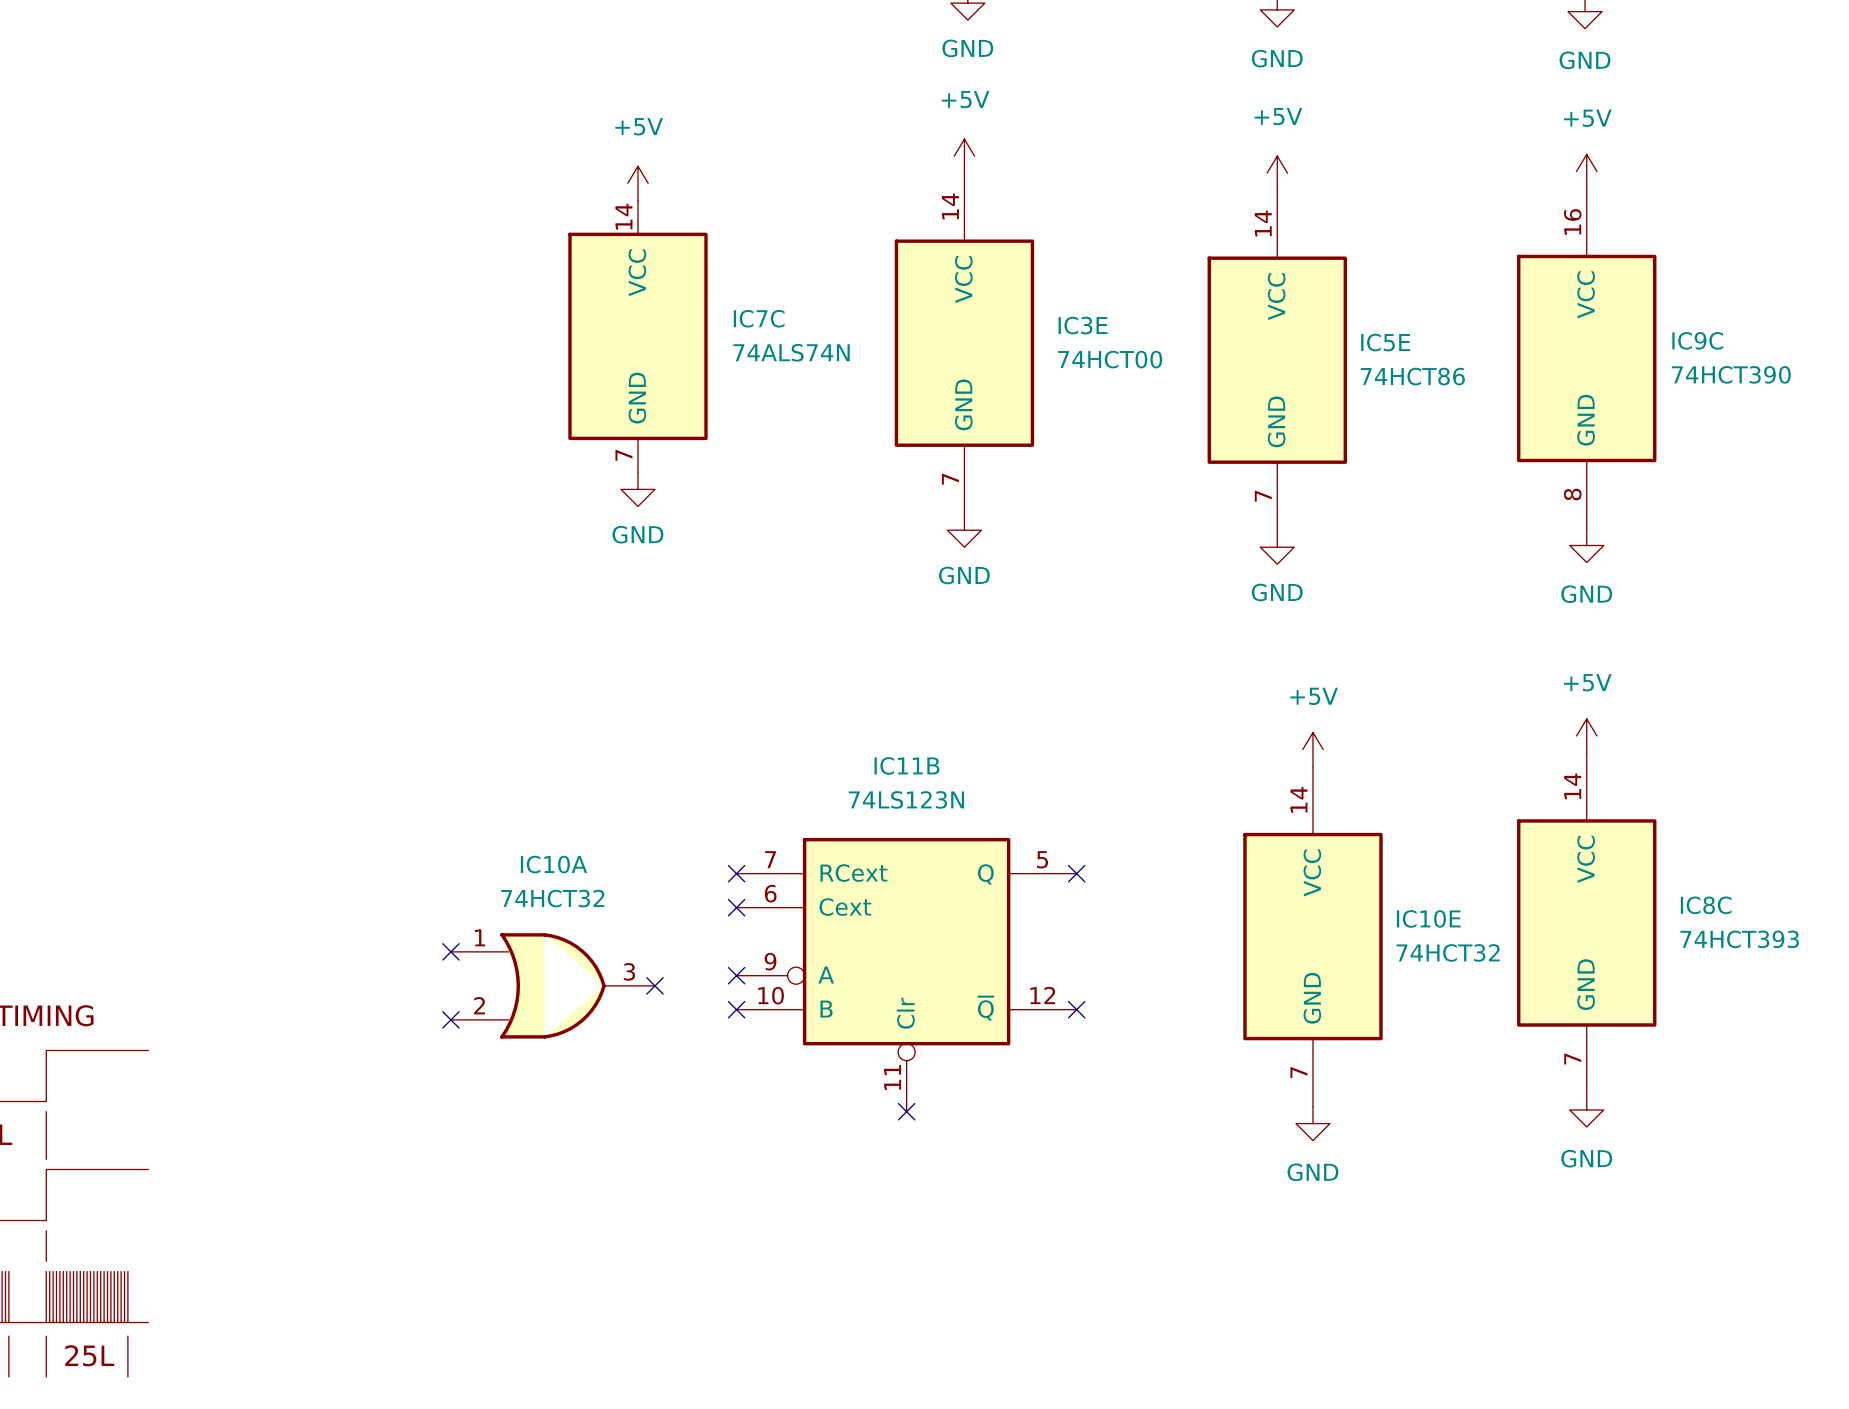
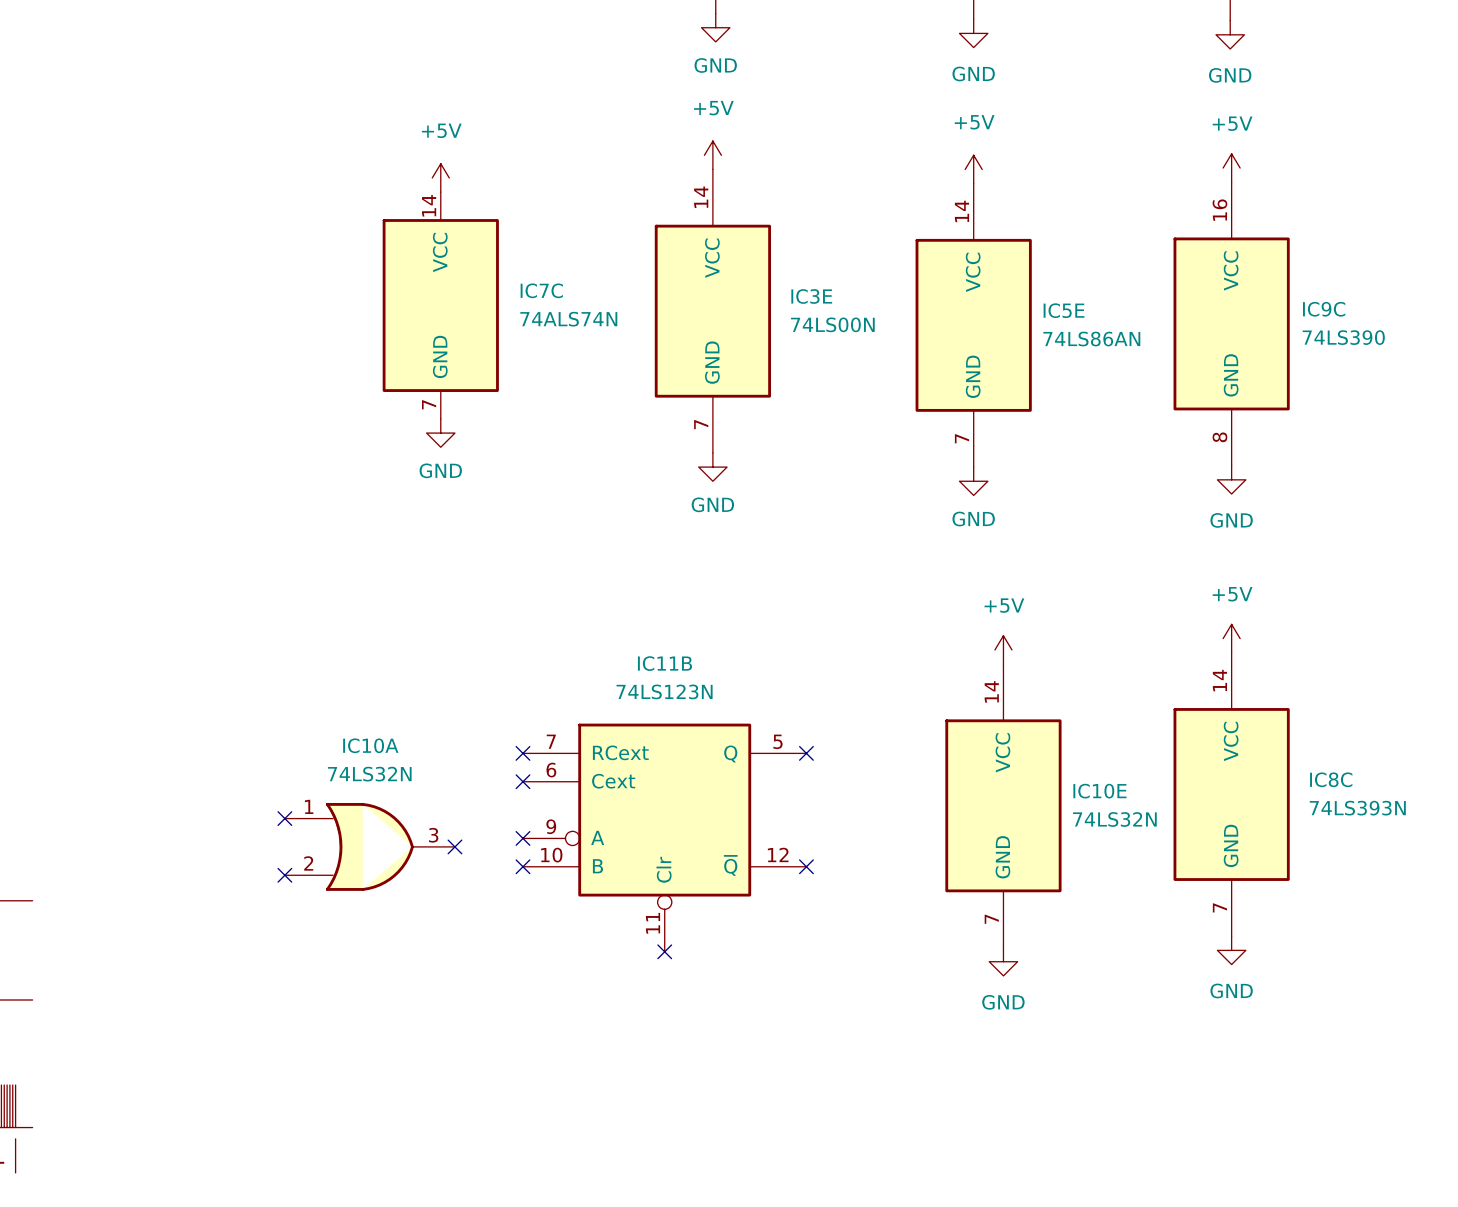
IC3E value: 74HCT00 (1110, 359) -> 74LS00N (832, 324)
IC9C value: 74HCT390 (1731, 374) -> 74LS390 (1343, 337)
IC5E value: 74HCT86 (1412, 376) -> 74LS86AN (1091, 339)
IC10A value: 74HCT32 (552, 898) -> 74LS32N (369, 774)
IC8C value: 74HCT393 (1739, 939) -> 74LS393N (1357, 808)
IC10E value: 74HCT32 (1448, 952) -> 74LS32N (1114, 819)

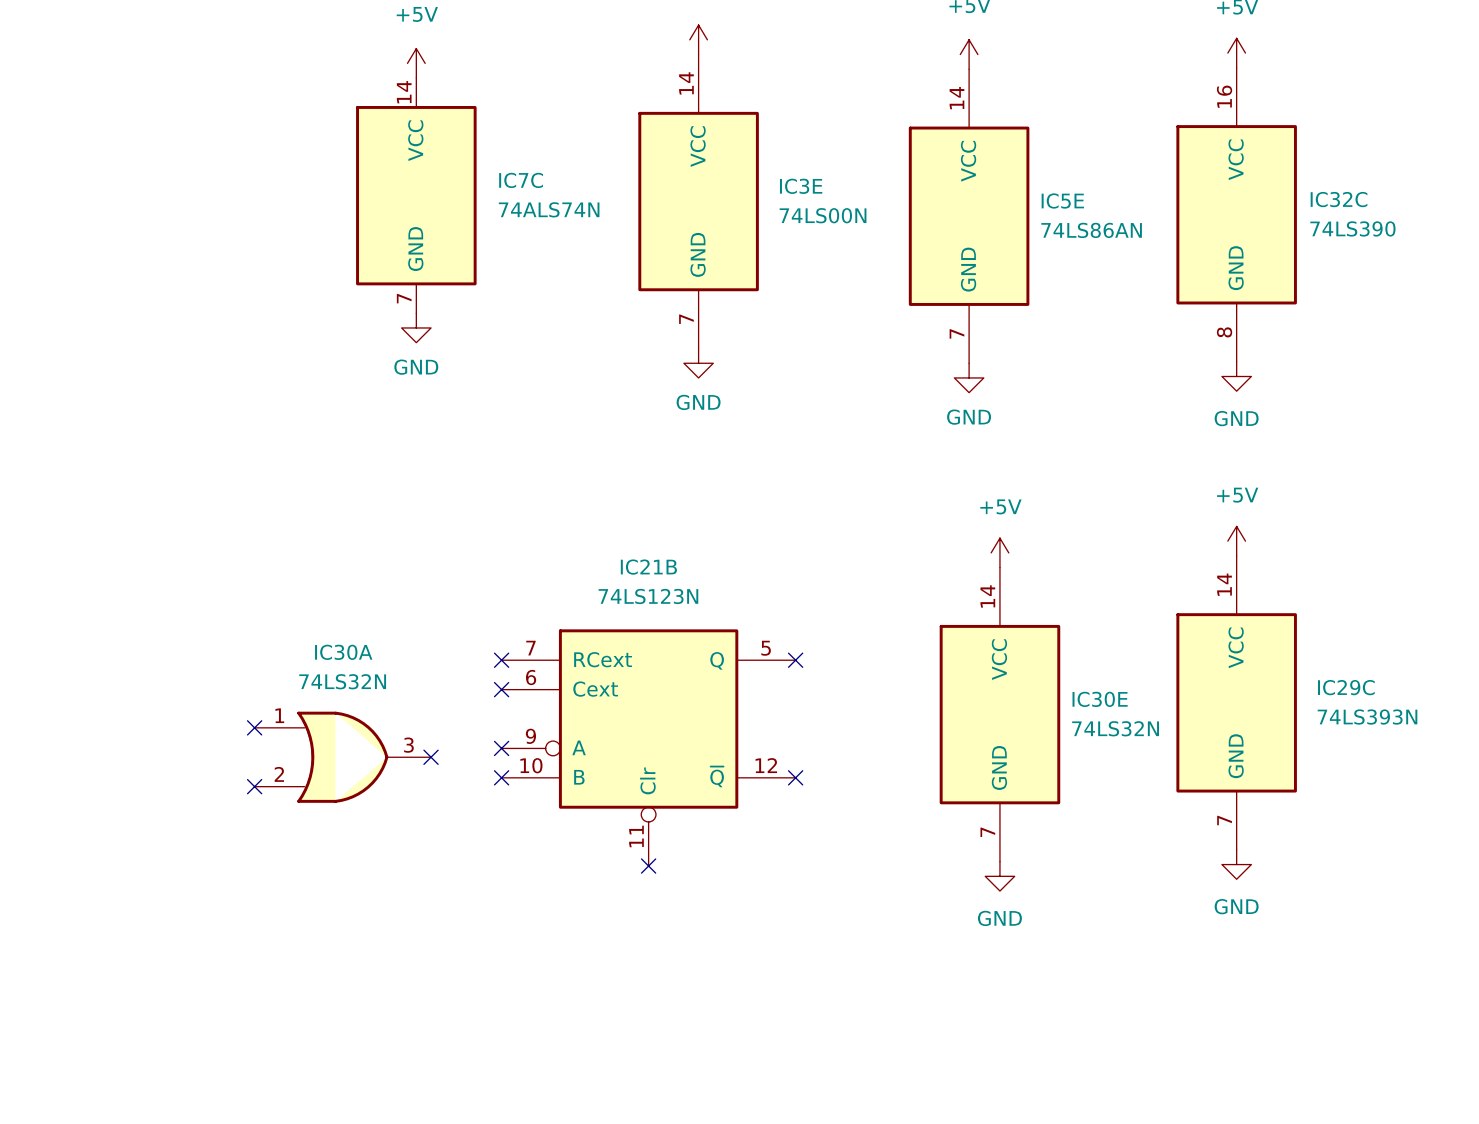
IC9C name: IC9C (1324, 309) -> IC32C (1339, 199)
IC11B name: IC11B (664, 663) -> IC21B (648, 567)
IC10A name: IC10A (370, 745) -> IC30A (343, 652)
IC8C name: IC8C (1331, 779) -> IC29C (1346, 687)
IC10E name: IC10E (1099, 791) -> IC30E (1100, 699)

